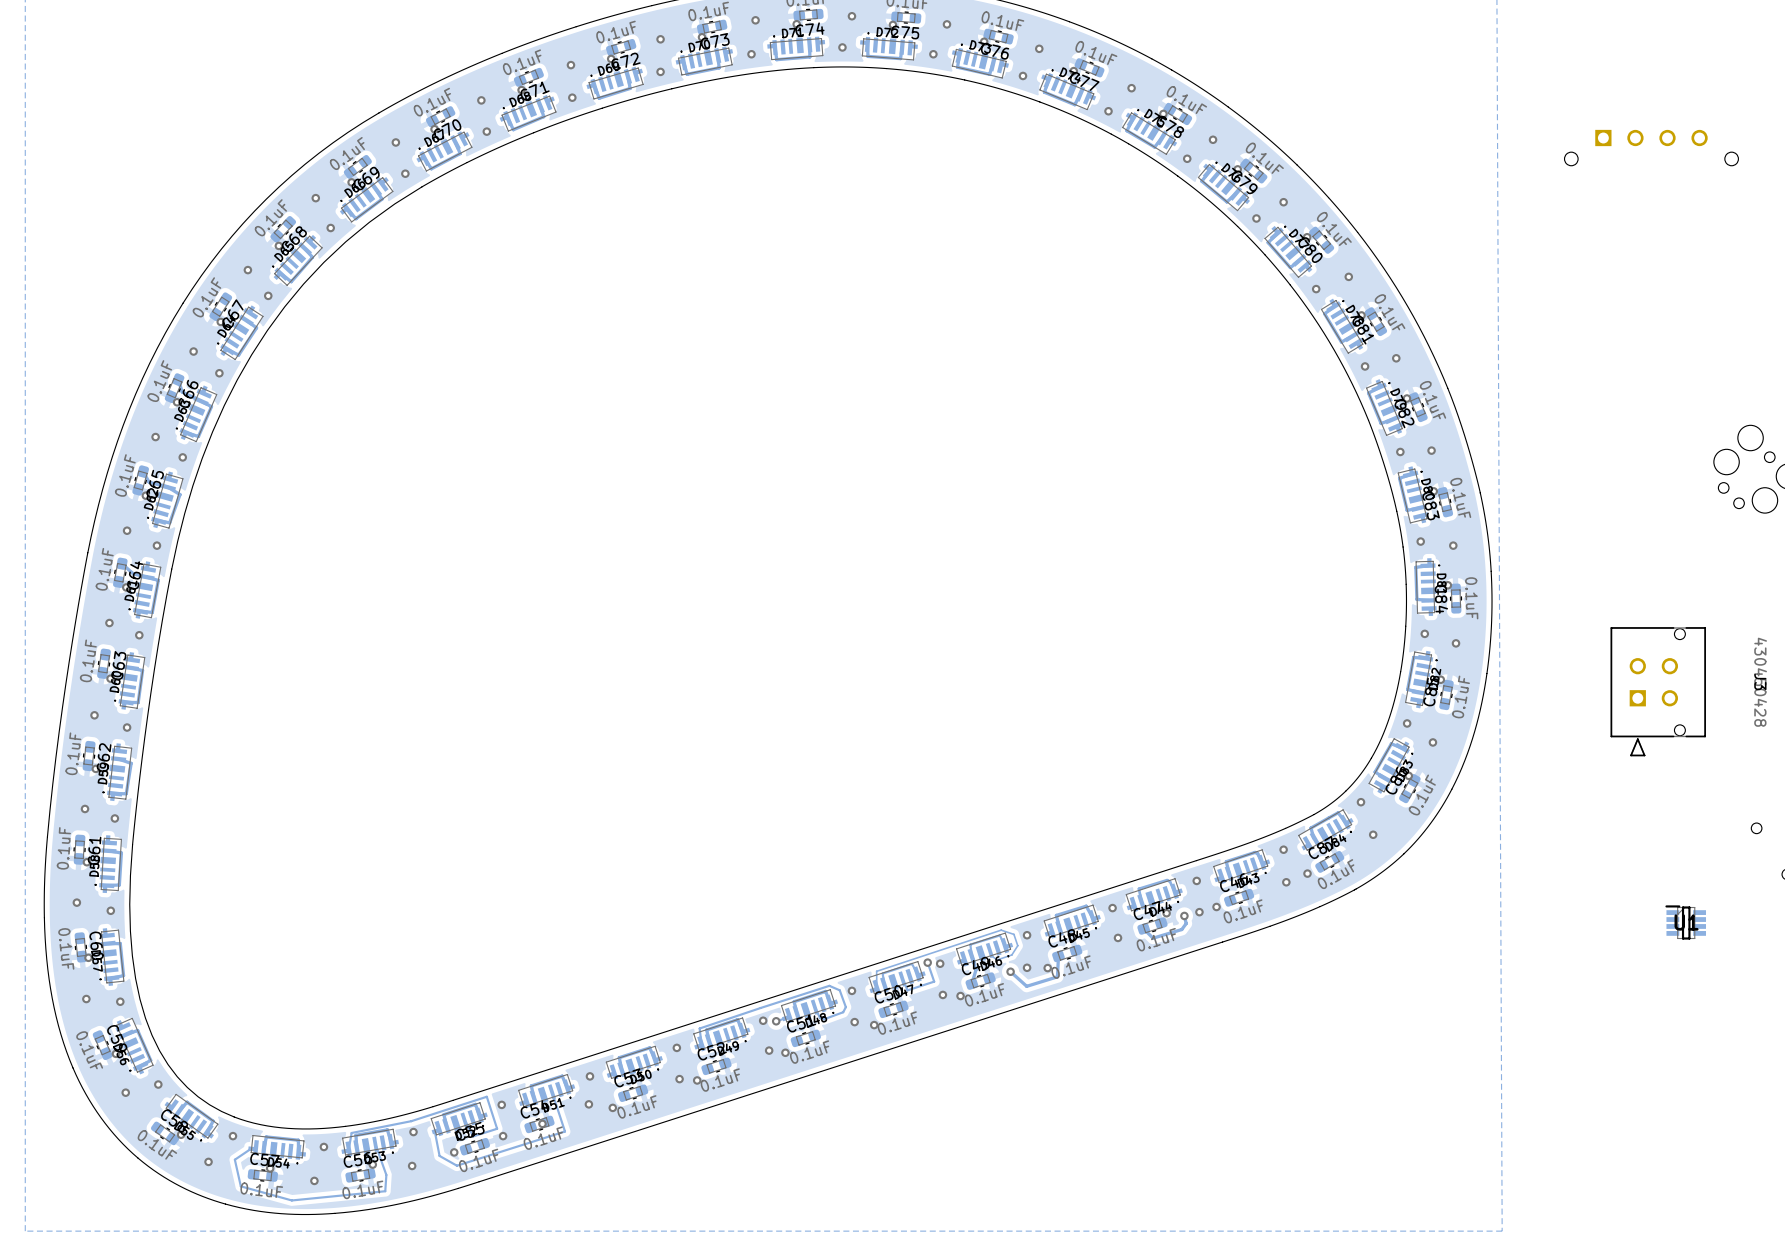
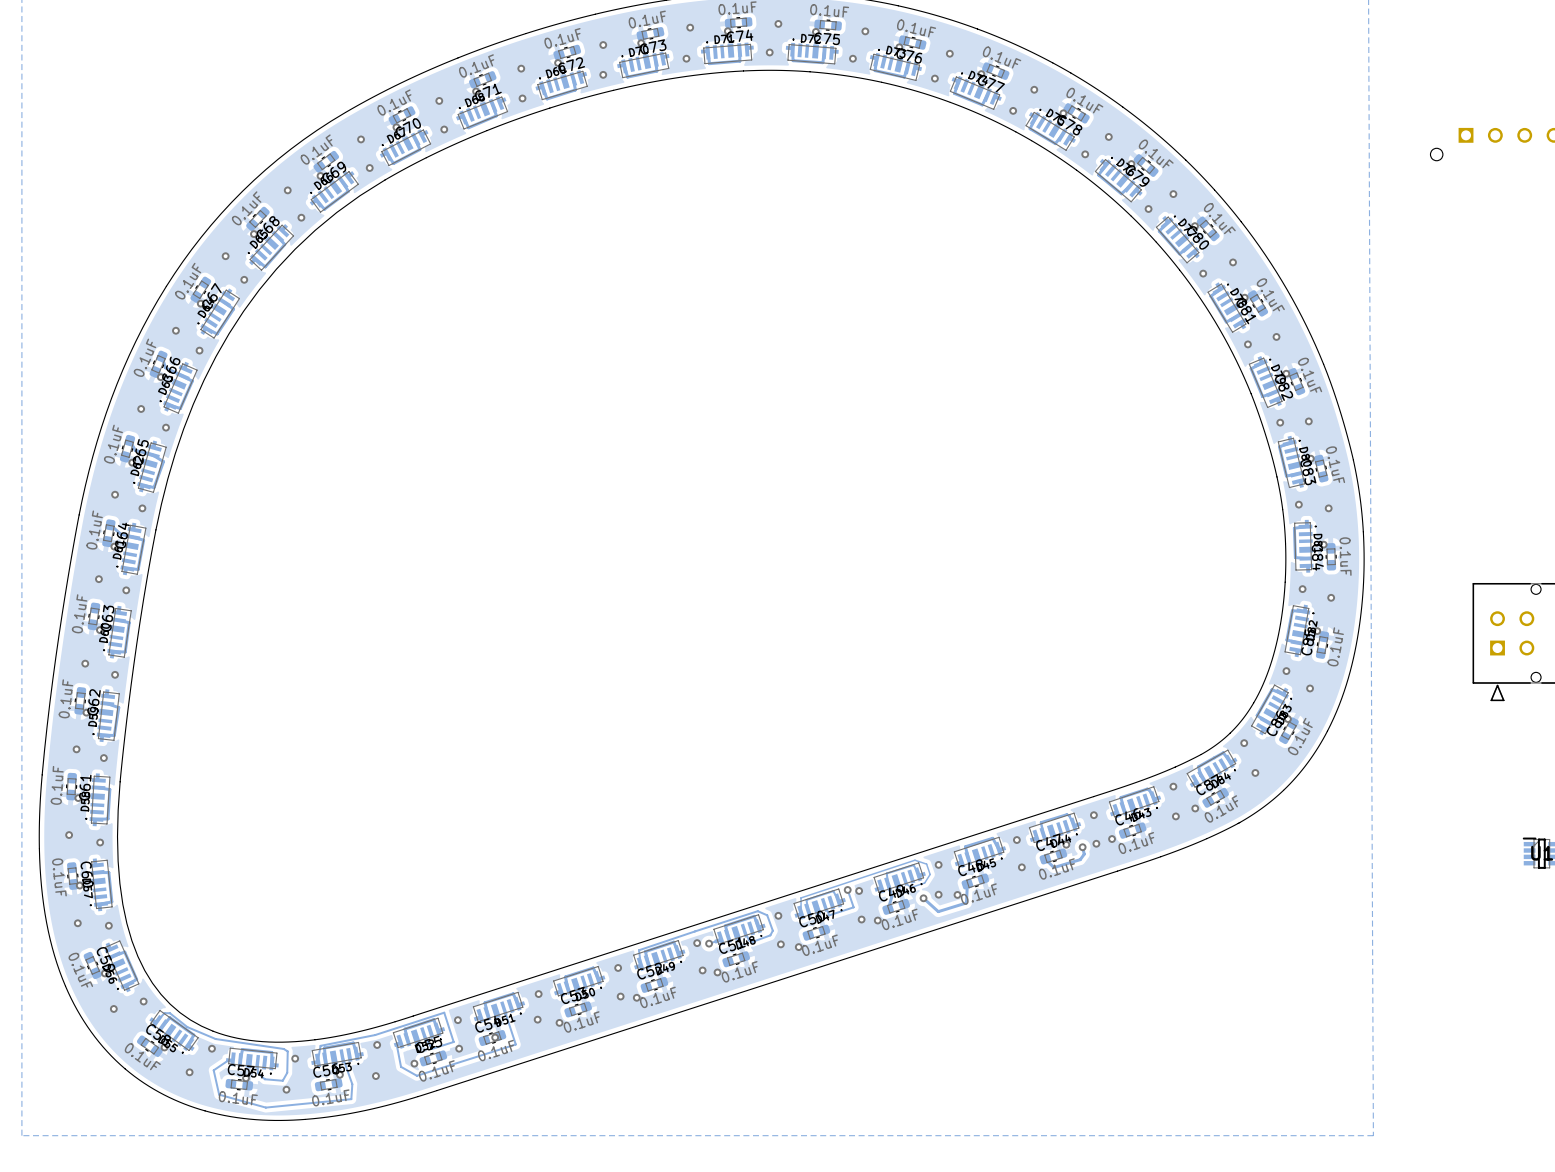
track: none -> (156, 1021) (164, 1013) (169, 1013) (187, 1027) (215, 1039) (283, 1048) (287, 1051) (287, 1072) (282, 1080) (264, 1079) (257, 1073) (257, 1061)

